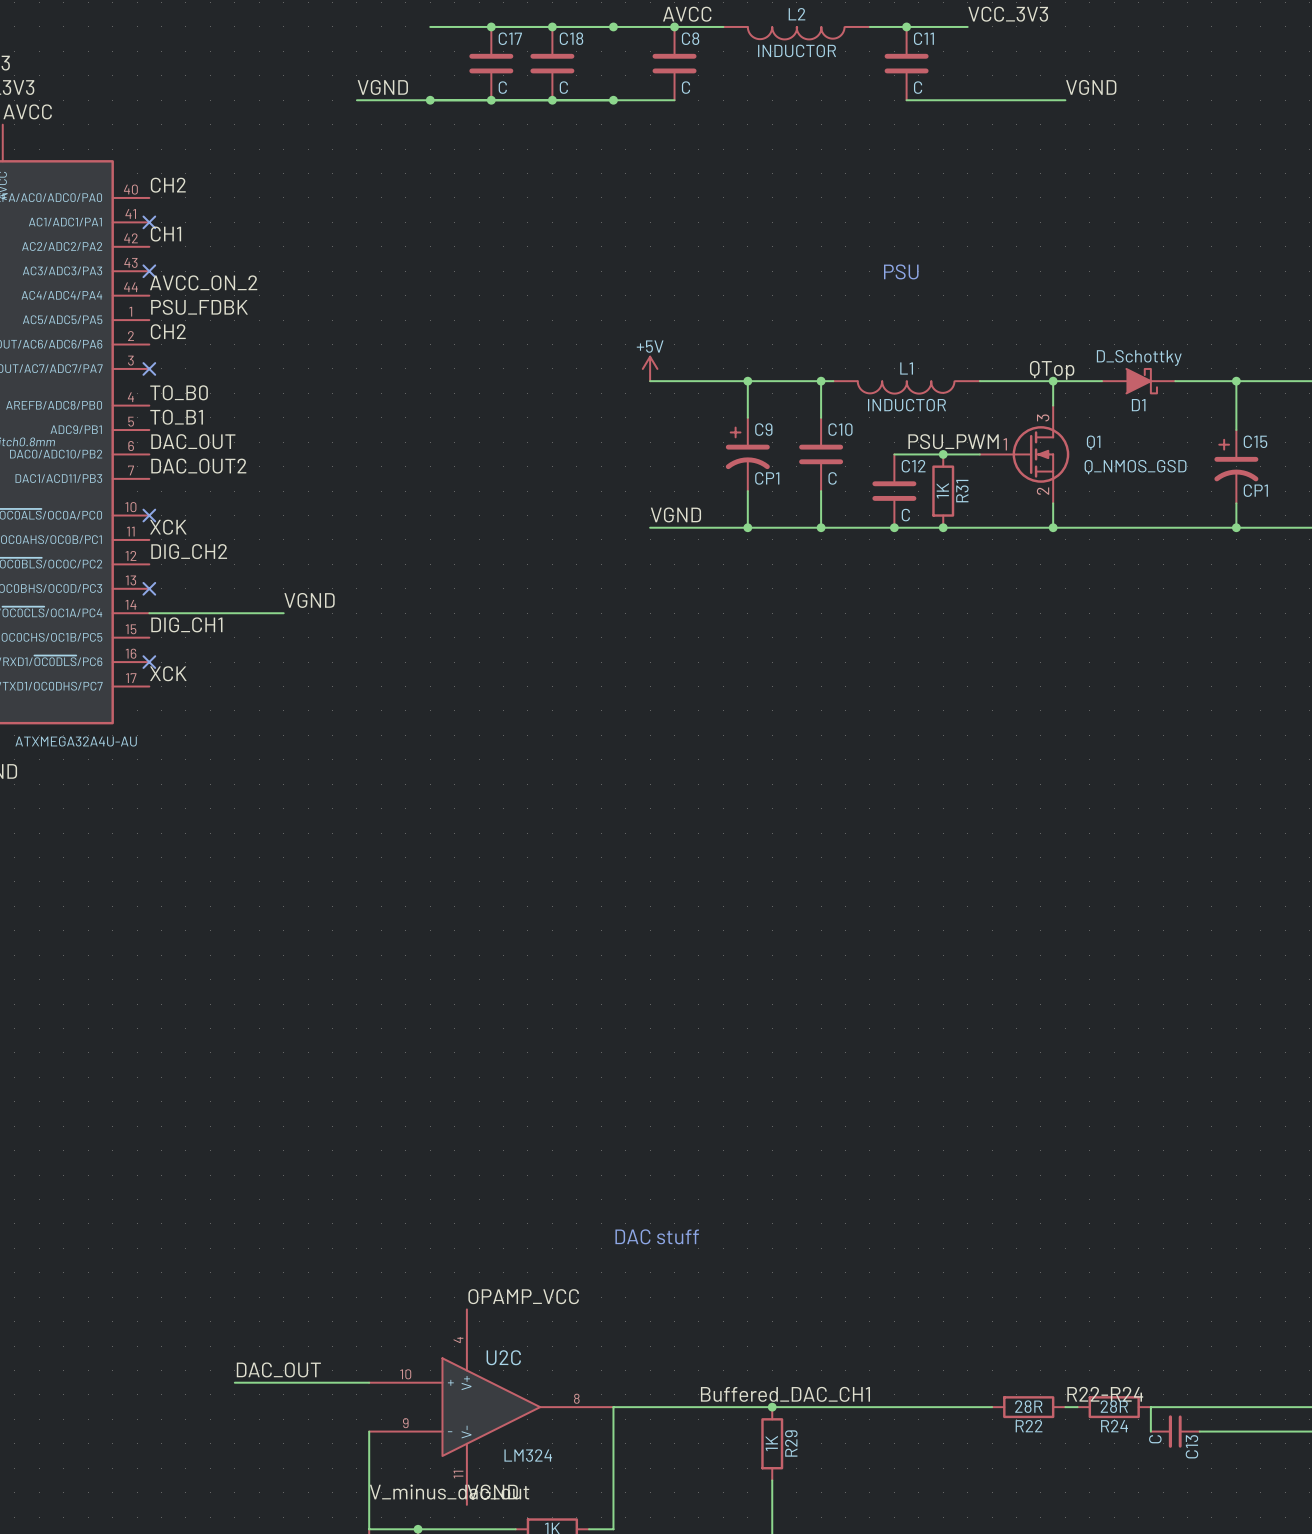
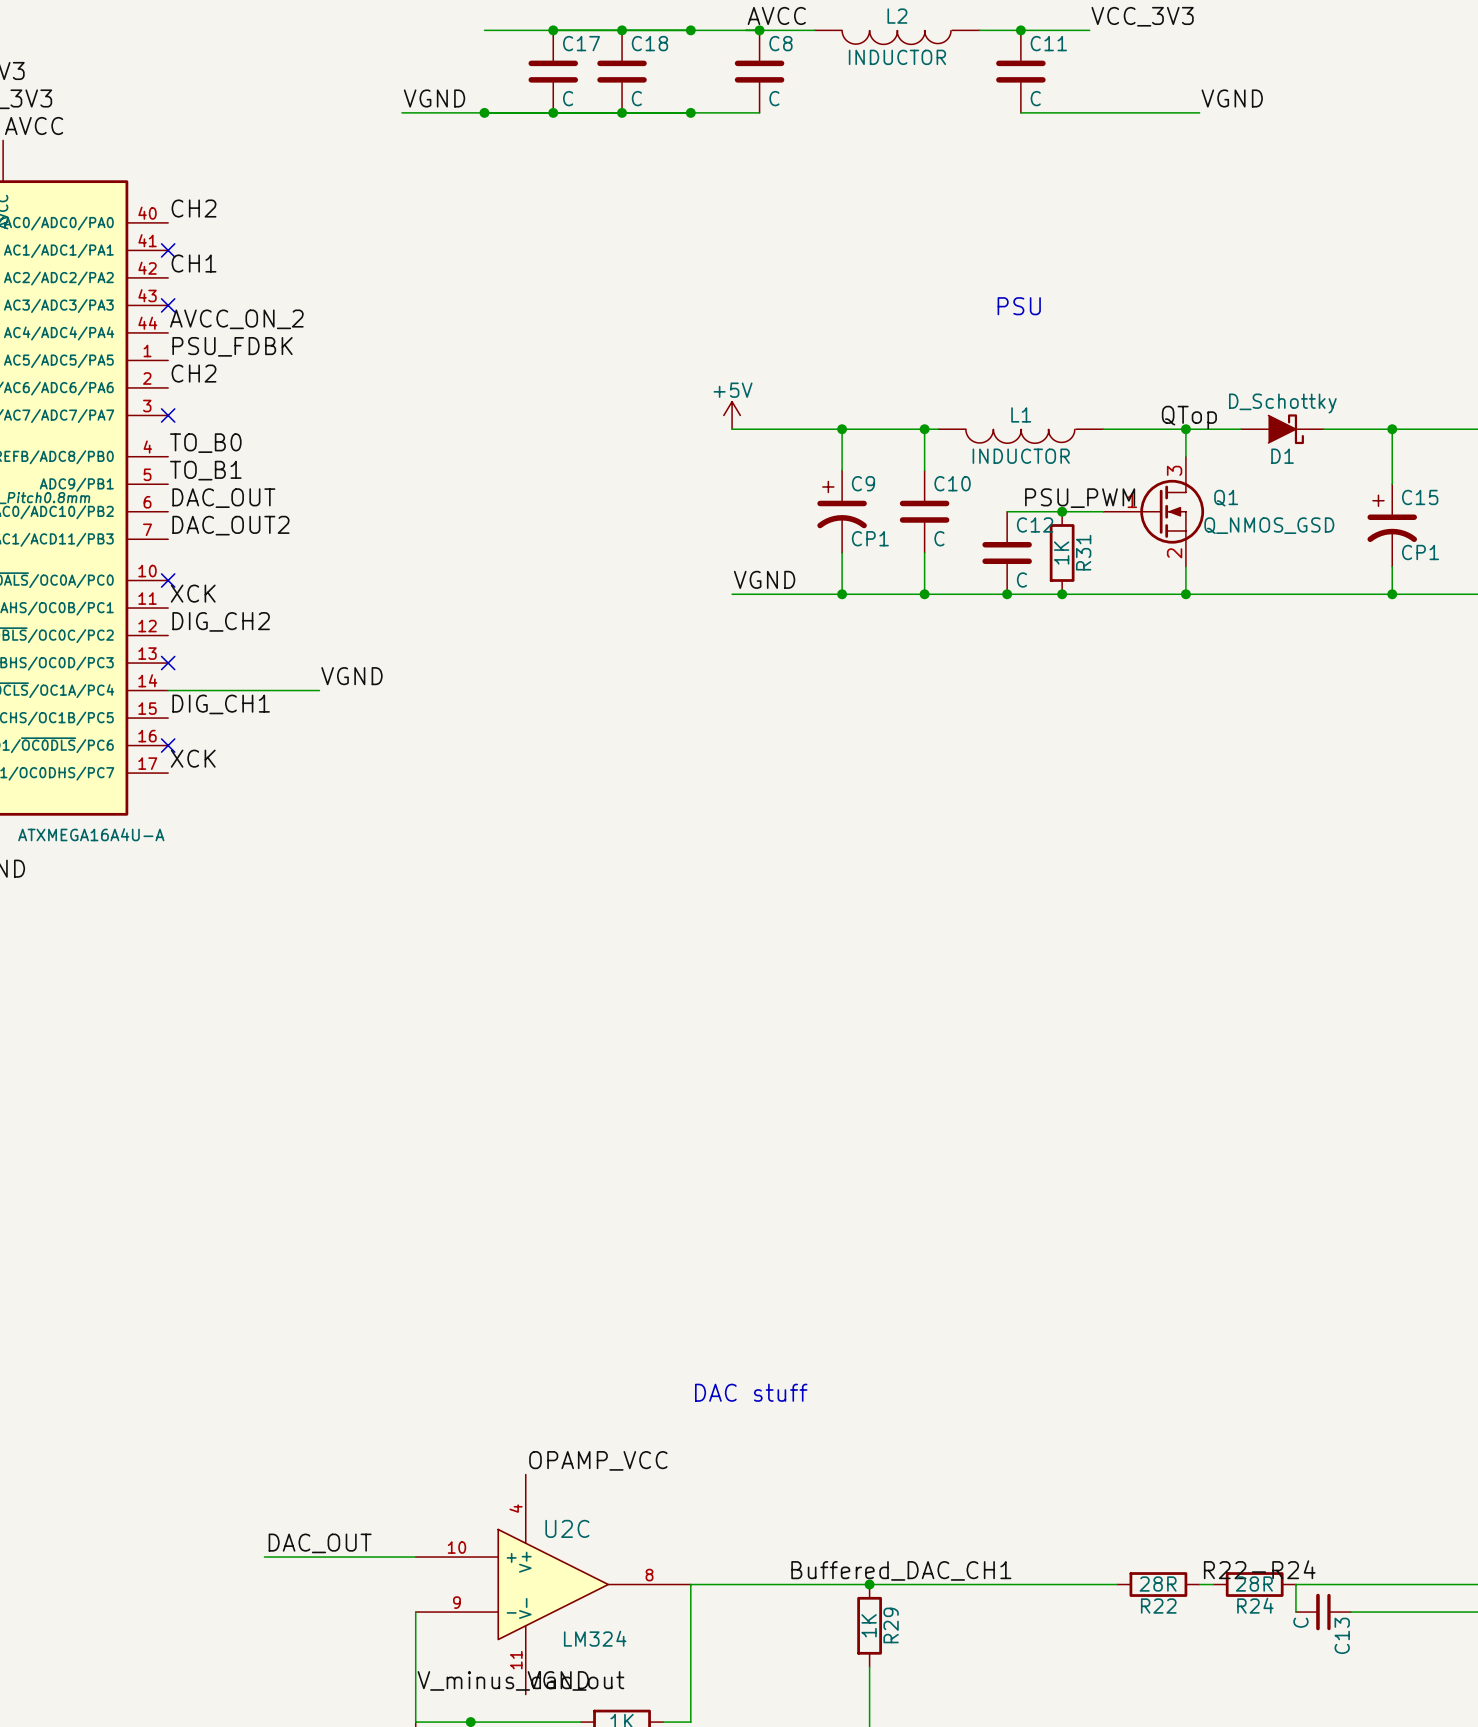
part value: ATXMEGA32A4U-AU (76, 741) -> ATXMEGA16A4U-A (91, 834)

